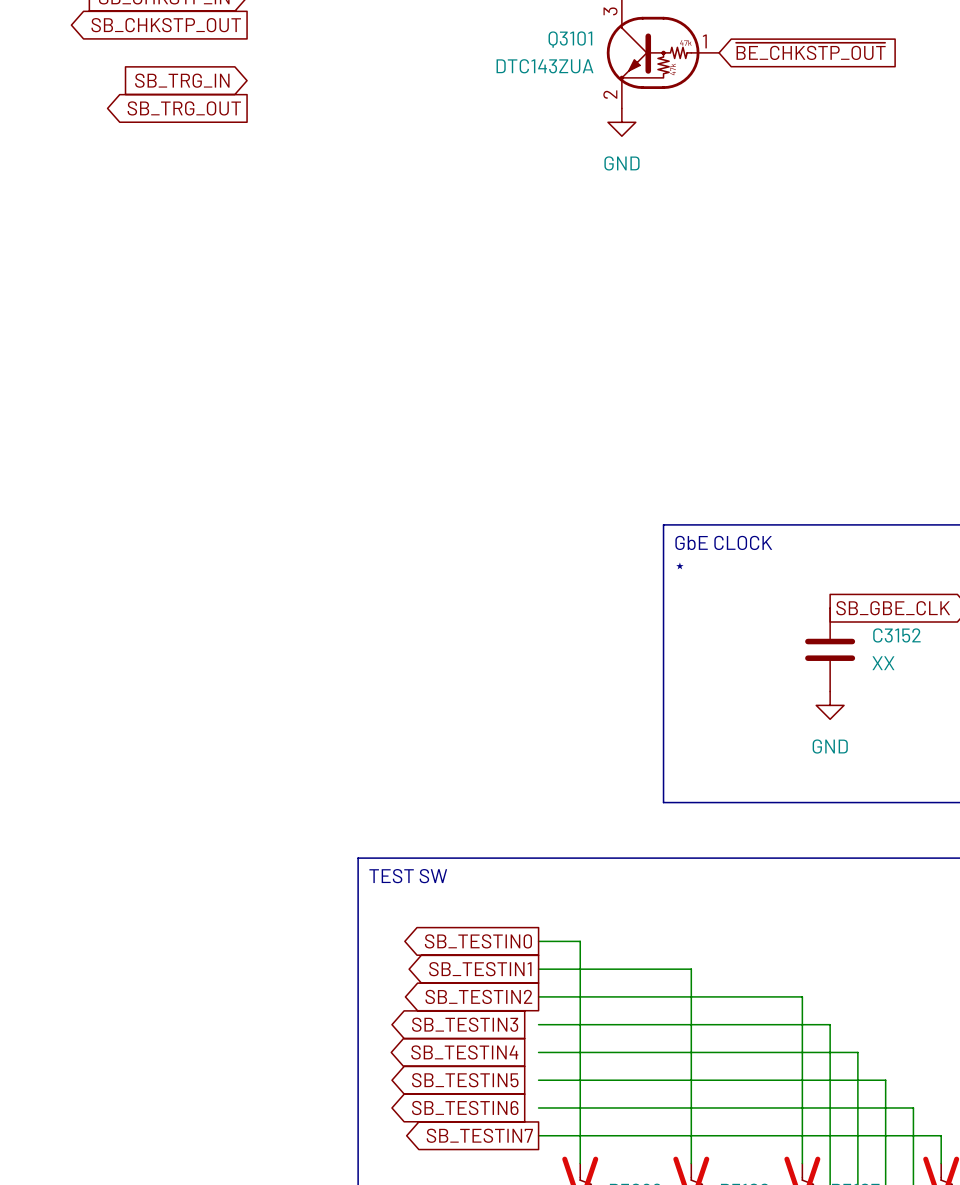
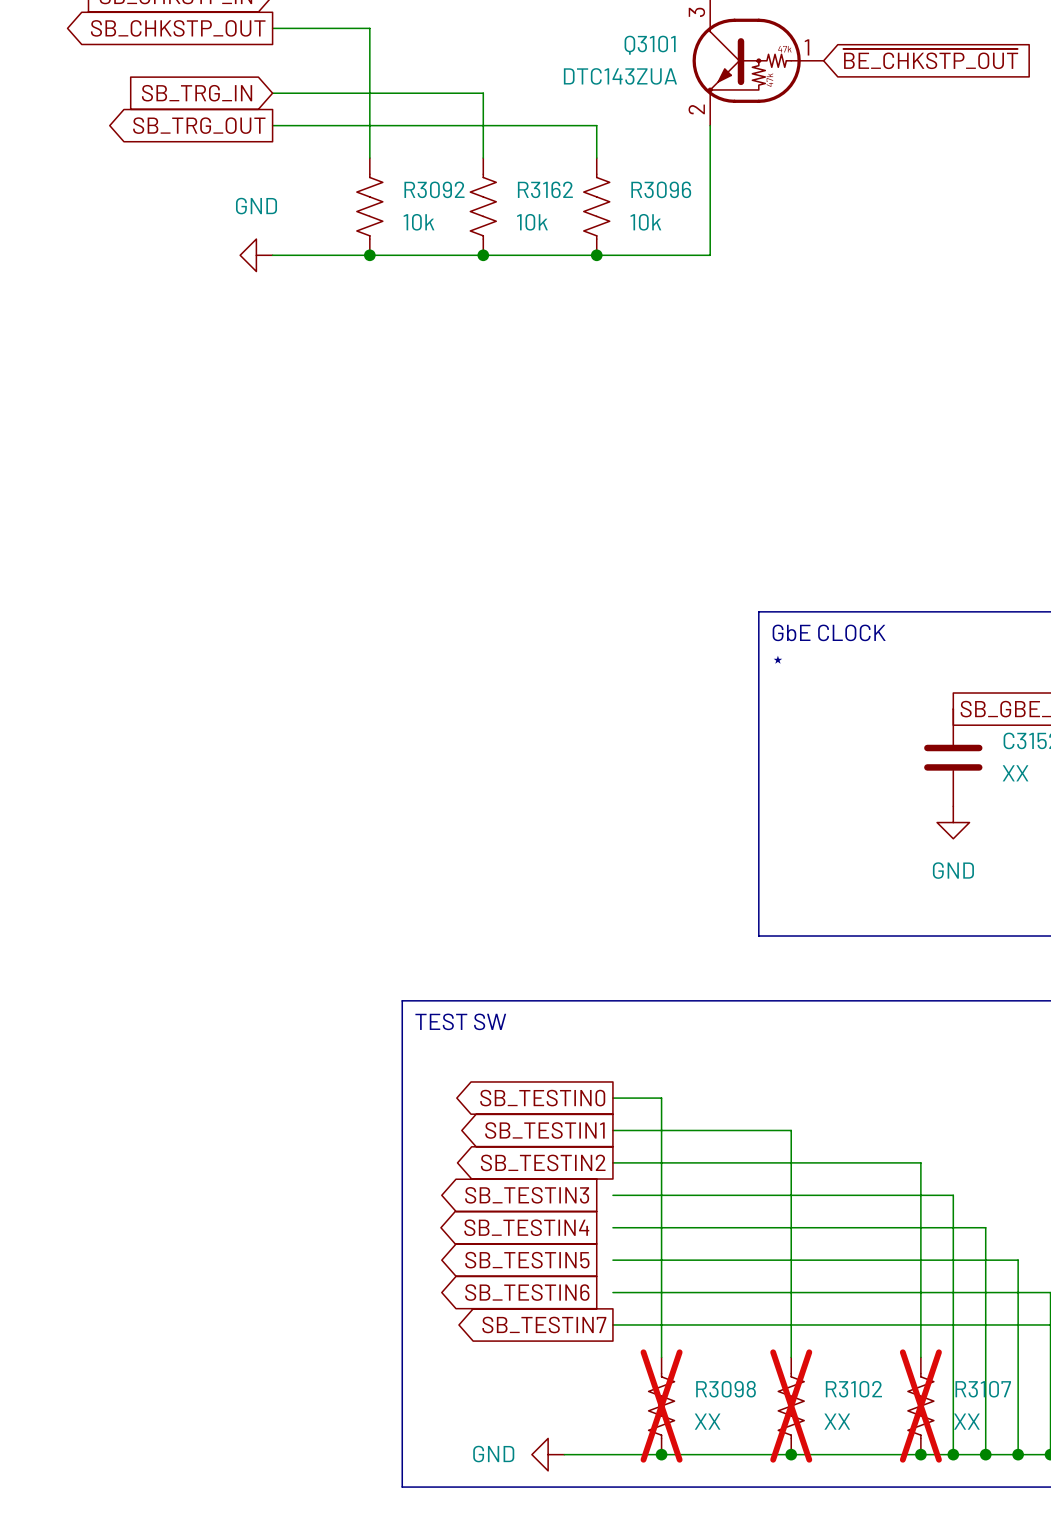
wire: none -> (272, 28) (369, 28) (369, 158)
wire: none -> (272, 93) (483, 93) (483, 158)
wire: none -> (272, 125) (596, 125) (596, 158)
wire: none -> (710, 125) (710, 255) (272, 255)
power symbol: GND (621, 122) -> none
R3092: none -> 10k (369, 206)
R3162: none -> 10k (483, 206)
R3096: none -> 10k (596, 206)
power symbol: none -> GND (256, 255)
junction: none -> (369, 255)
junction: none -> (483, 255)
junction: none -> (596, 255)

